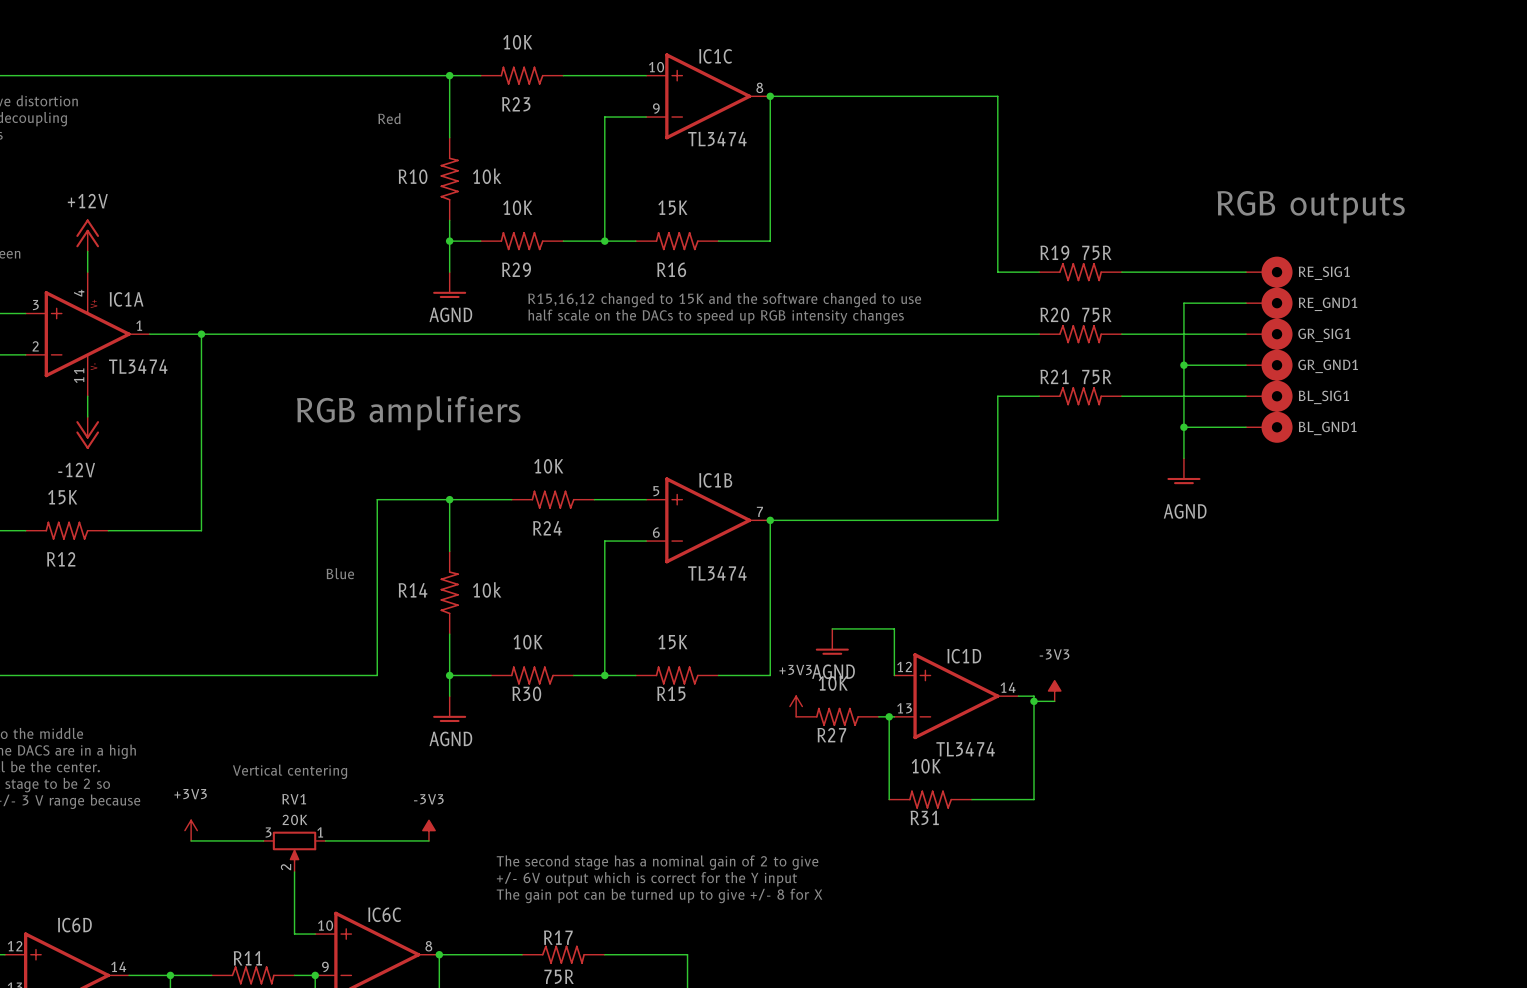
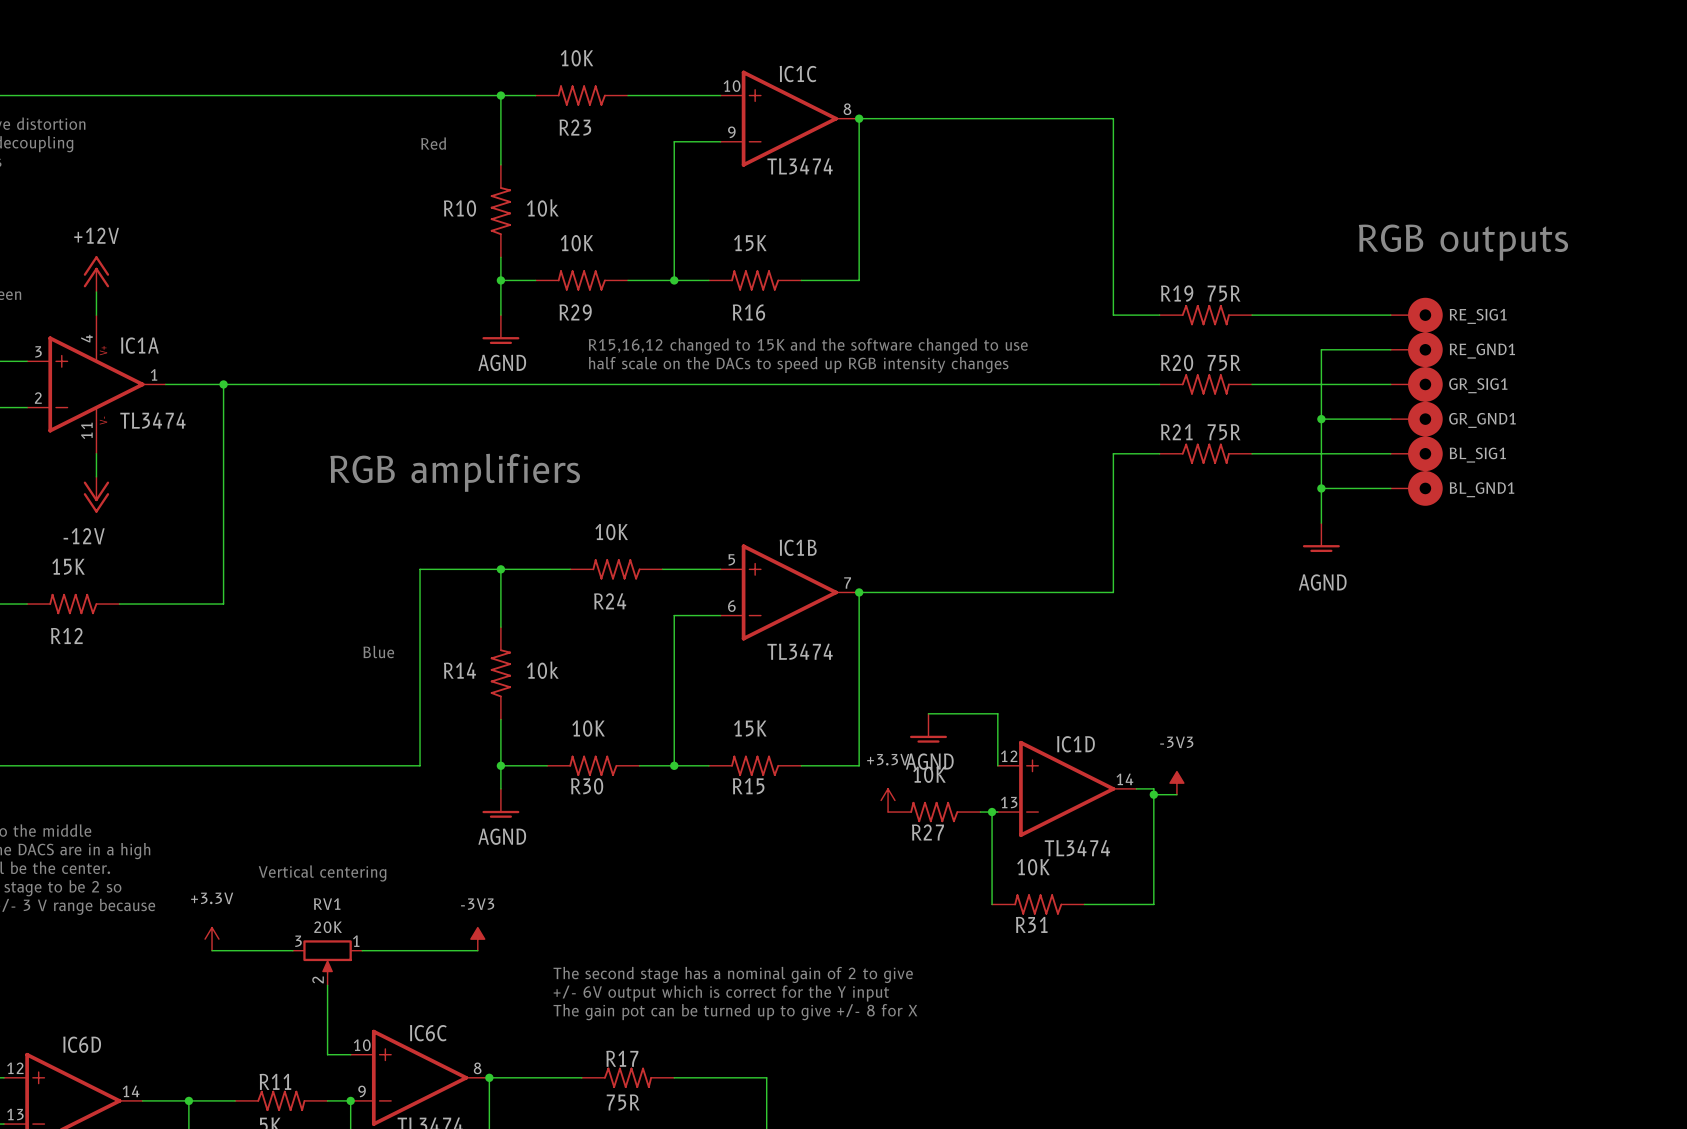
power symbol: +3V3 (796, 706) -> +3.3V (888, 800)
power symbol: +3V3 (191, 830) -> +3.3V (212, 939)

